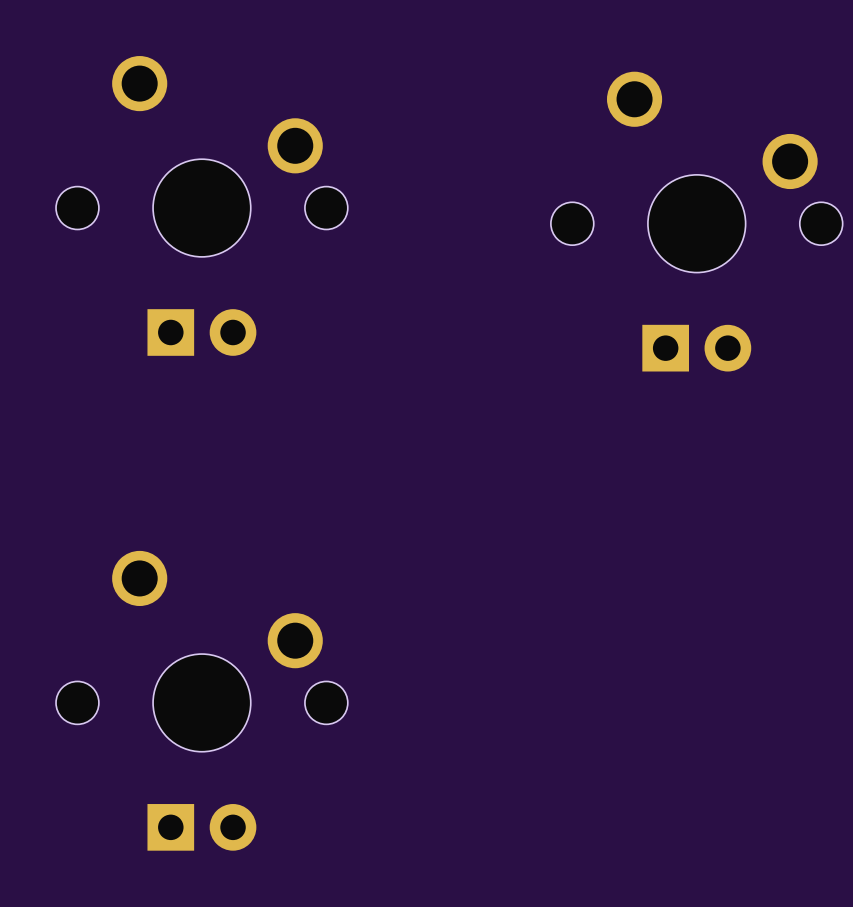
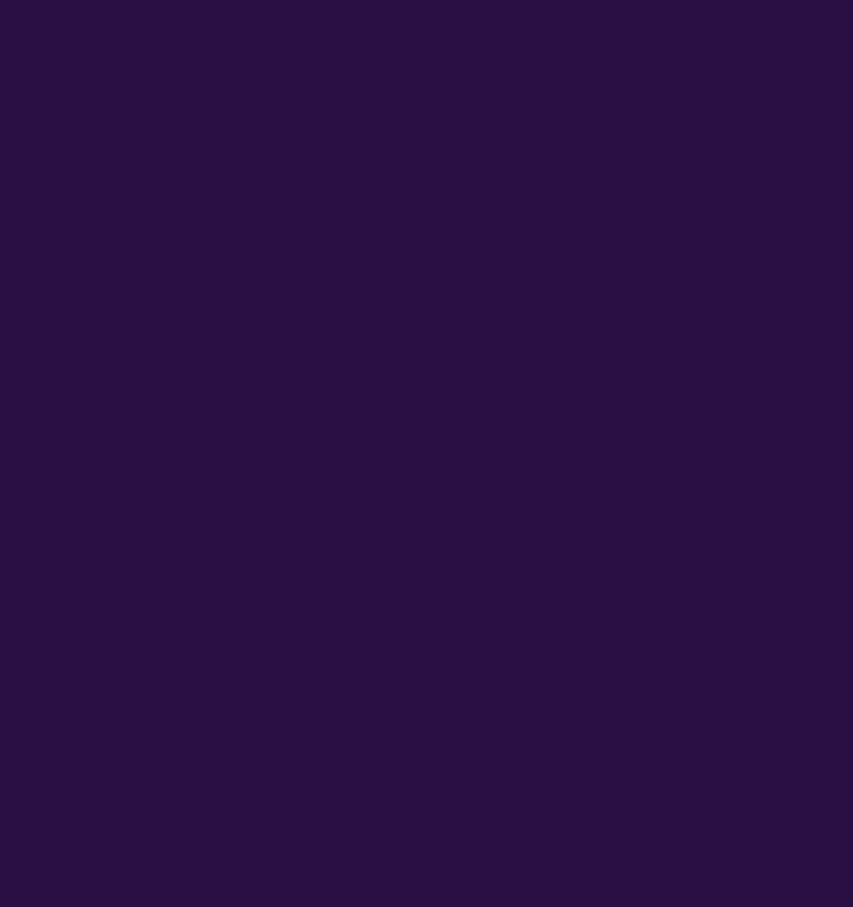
part: (201, 205) -> none
part: (696, 221) -> none
part: (201, 700) -> none

